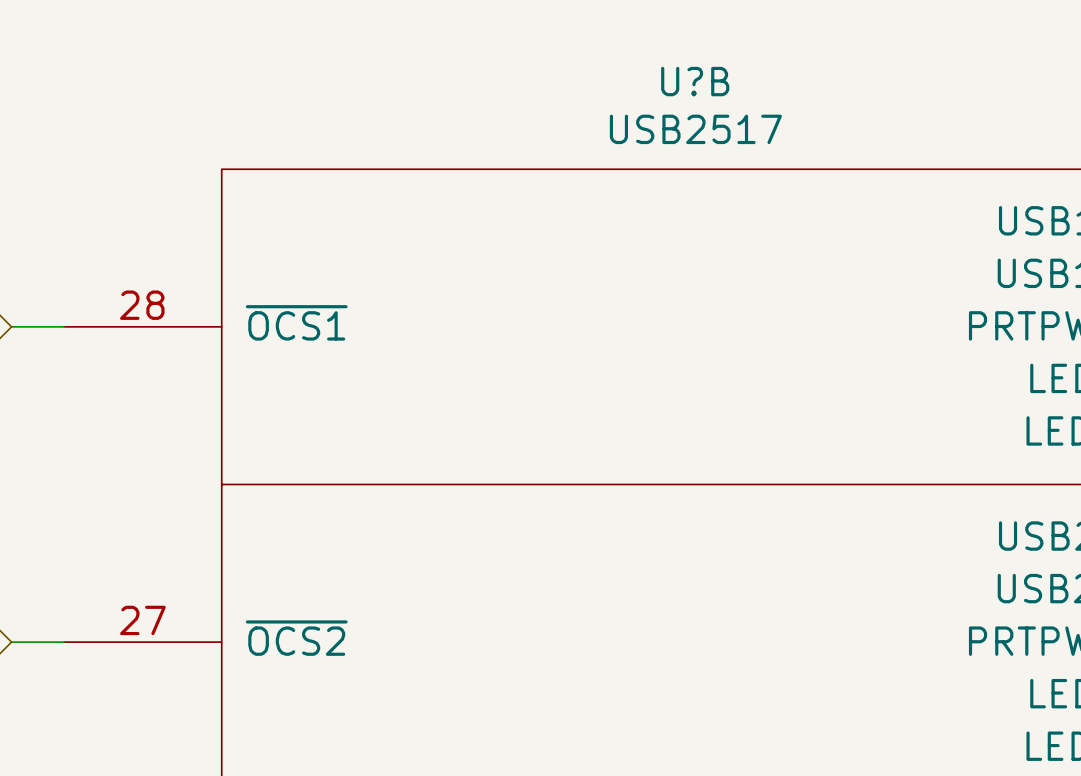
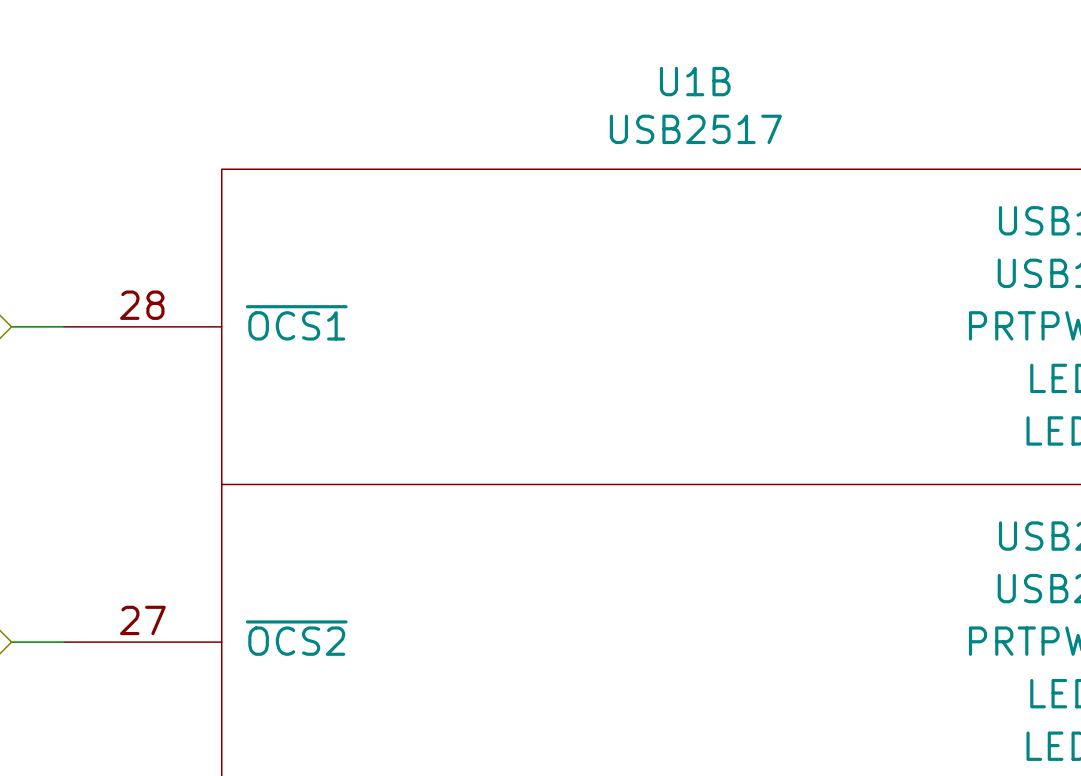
U?B name: U?B (695, 81) -> U1B (695, 81)

